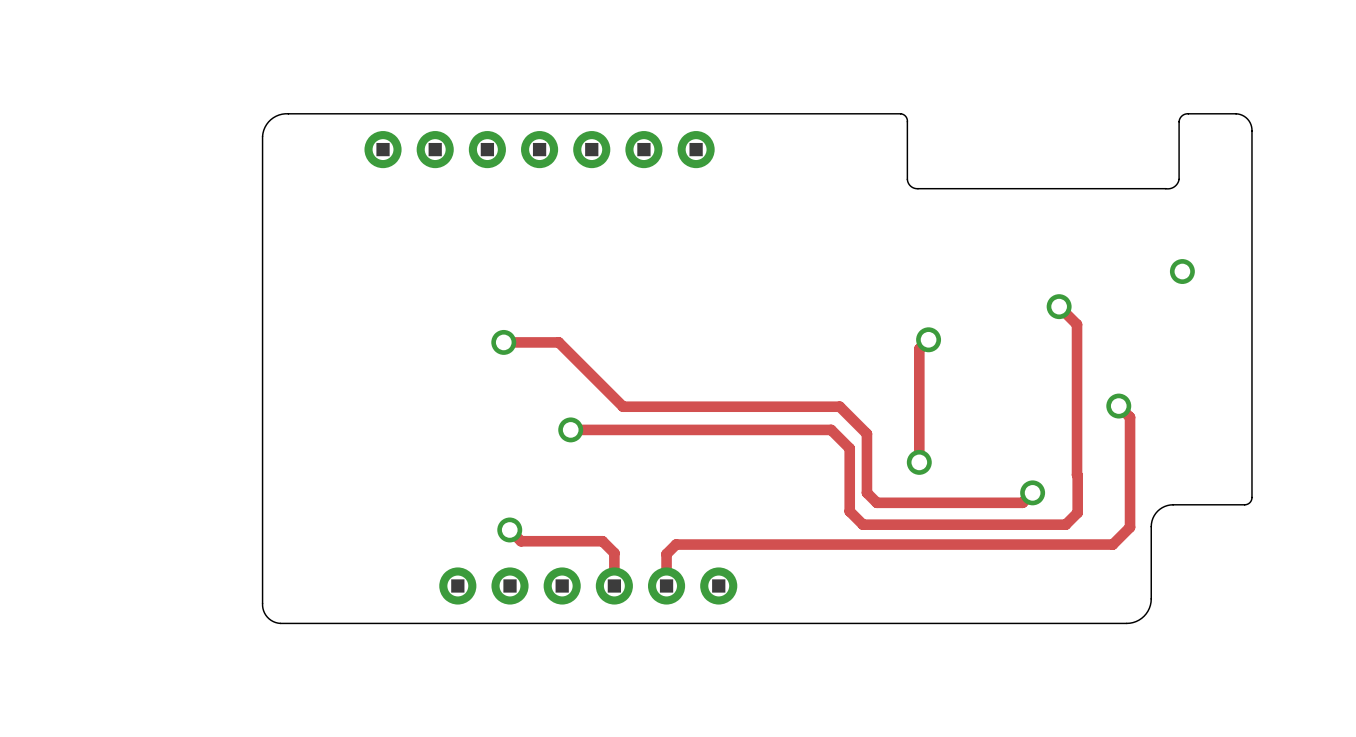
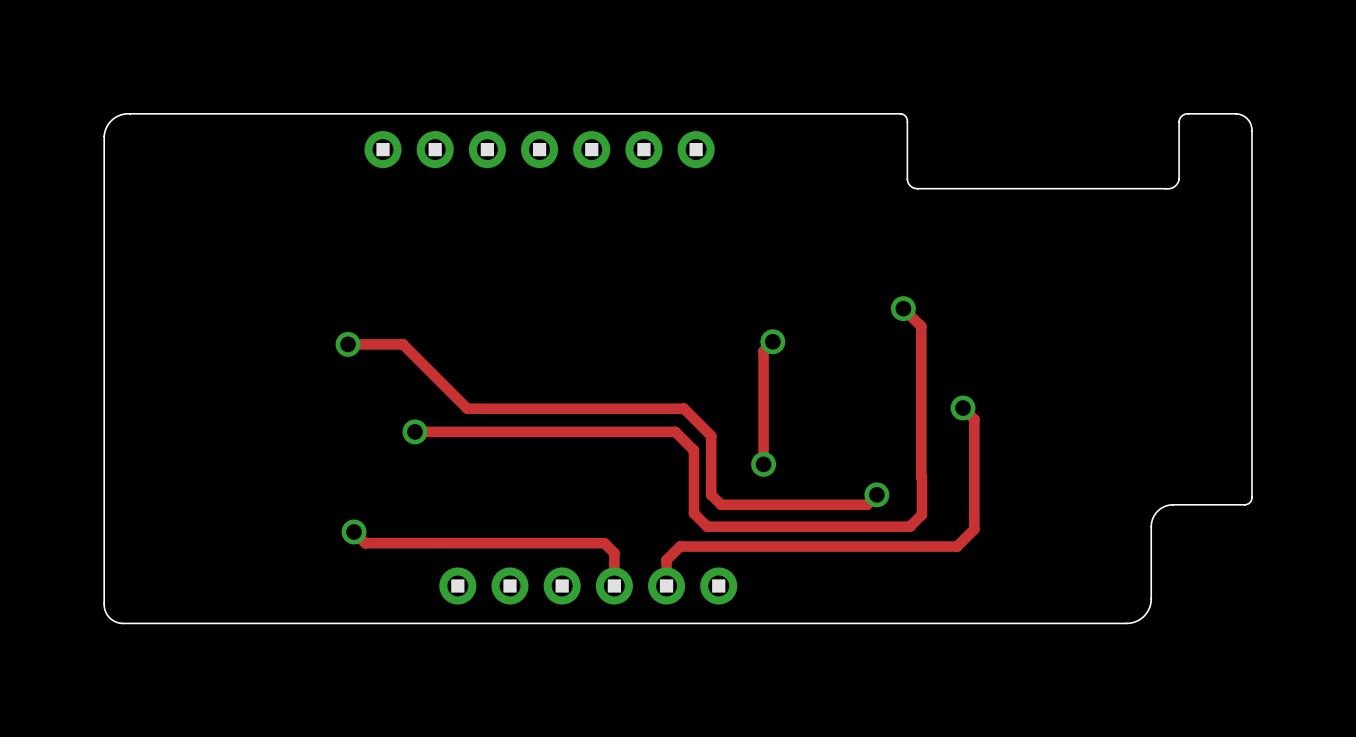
board edge: (288, 113) (279, 115) (270, 119) (265, 127) (262, 136) (262, 606) (269, 618) (280, 623) -> (288, 113) (126, 113) (117, 116) (110, 121) (104, 136) (105, 610) (112, 620) (122, 623) (280, 623)
via: (1182, 271) -> none
track: (1059, 306) (1077, 324) (1077, 512) (1065, 524) (862, 524) (849, 511) (849, 448) (831, 429) (570, 429) -> (903, 308) (921, 326) (921, 514) (910, 526) (707, 526) (693, 513) (693, 450) (675, 431) (414, 431)
via: (1059, 306) -> none
via: none -> (903, 308)
track: (928, 339) (919, 349) (919, 462) -> (772, 341) (763, 351) (763, 464)
via: (928, 339) -> none
via: none -> (772, 341)
track: (503, 342) (558, 342) (623, 406) (839, 406) (866, 433) (866, 492) (876, 502) (1022, 502) (1032, 492) -> (348, 344) (403, 344) (467, 408) (684, 408) (711, 435) (711, 494) (721, 504) (866, 504) (876, 494)
via: (503, 342) -> none
via: none -> (348, 344)
track: (1118, 406) (1130, 417) (1130, 527) (1112, 544) (676, 544) (666, 554) (666, 560) -> (963, 408) (974, 419) (974, 529) (957, 546) (680, 546) (666, 560)
via: (1118, 406) -> none
via: none -> (963, 408)
via: (570, 429) -> none
via: none -> (414, 431)
via: (919, 462) -> none
via: none -> (763, 464)
via: (1032, 492) -> none
via: none -> (876, 494)
track: (509, 529) (521, 541) (602, 541) (604, 543) -> (354, 531) (365, 543) (604, 543)
via: (509, 529) -> none
via: none -> (354, 531)

